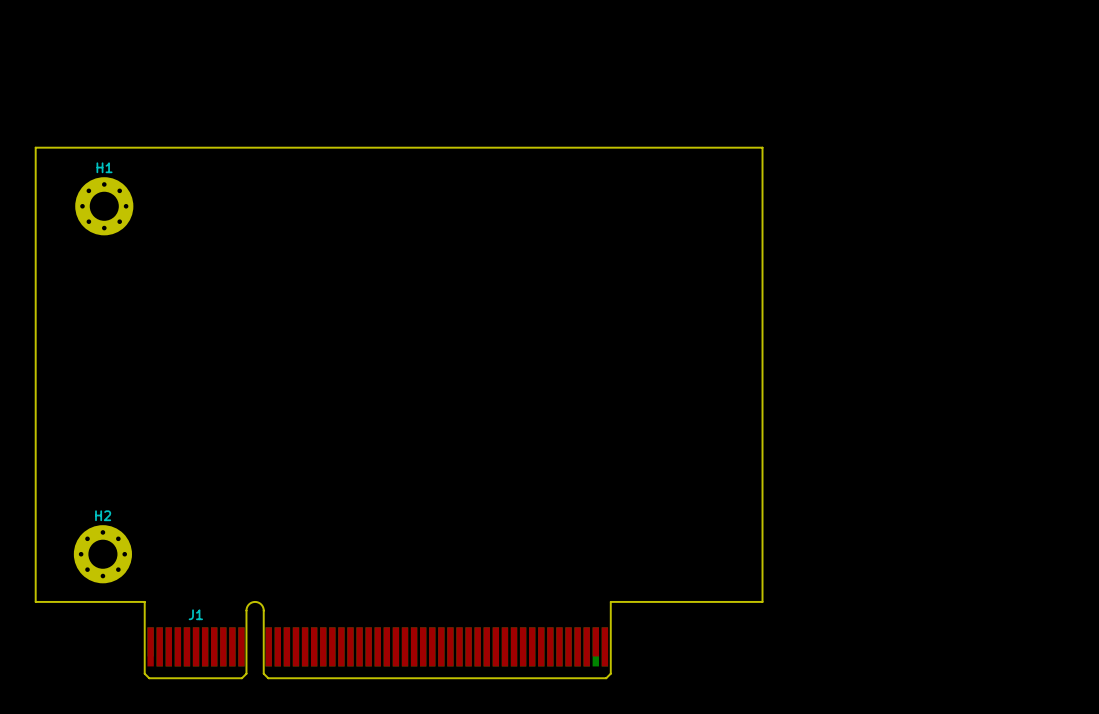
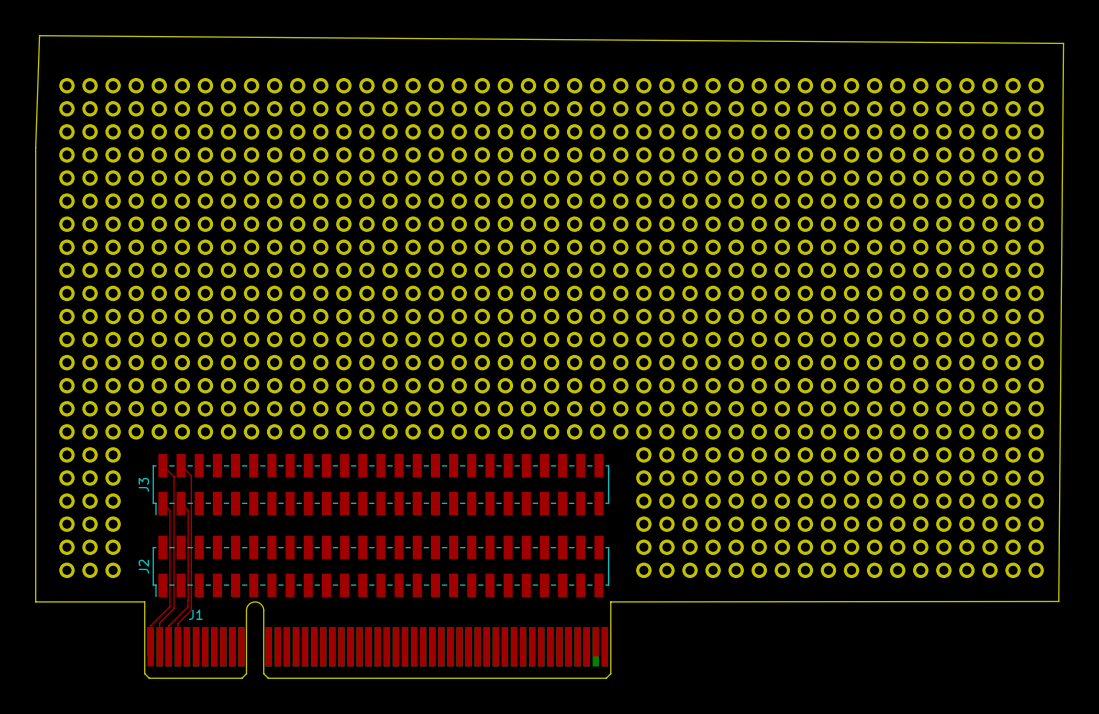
part: none -> (66, 85)
part: none -> (90, 85)
part: none -> (113, 85)
part: none -> (136, 85)
part: none -> (159, 85)
part: none -> (182, 85)
part: none -> (205, 85)
part: none -> (228, 85)
part: none -> (251, 85)
part: none -> (274, 85)
part: none -> (297, 85)
part: none -> (320, 85)
part: none -> (343, 85)
part: none -> (366, 85)
part: none -> (390, 85)
part: none -> (413, 85)
part: none -> (436, 85)
part: none -> (459, 85)
part: none -> (482, 85)
part: none -> (505, 85)
part: none -> (528, 85)
part: none -> (551, 85)
part: none -> (574, 85)
part: none -> (597, 85)
part: none -> (620, 85)
part: none -> (643, 85)
part: none -> (666, 85)
part: none -> (690, 85)
part: none -> (713, 85)
part: none -> (736, 85)
part: none -> (759, 85)
part: none -> (782, 85)
part: none -> (805, 85)
part: none -> (828, 85)
part: none -> (851, 85)
part: none -> (874, 85)
part: none -> (897, 85)
part: none -> (920, 85)
part: none -> (943, 85)
part: none -> (966, 85)
part: none -> (990, 85)
part: none -> (1013, 85)
part: none -> (1036, 85)
part: none -> (66, 108)
part: none -> (90, 108)
part: none -> (113, 108)
part: none -> (136, 108)
part: none -> (159, 108)
part: none -> (182, 108)
part: none -> (205, 108)
part: none -> (228, 108)
part: none -> (251, 108)
part: none -> (274, 108)
part: none -> (297, 108)
part: none -> (320, 108)
part: none -> (343, 108)
part: none -> (366, 108)
part: none -> (390, 108)
part: none -> (413, 108)
part: none -> (436, 108)
part: none -> (459, 108)
part: none -> (482, 108)
part: none -> (505, 108)
part: none -> (528, 108)
part: none -> (551, 108)
part: none -> (574, 108)
part: none -> (597, 108)
part: none -> (620, 108)
part: none -> (643, 108)
part: none -> (666, 108)
part: none -> (690, 108)
part: none -> (713, 108)
part: none -> (736, 108)
part: none -> (759, 108)
part: none -> (782, 108)
part: none -> (805, 108)
part: none -> (828, 108)
part: none -> (851, 108)
part: none -> (874, 108)
part: none -> (897, 108)
part: none -> (920, 108)
part: none -> (943, 108)
part: none -> (966, 108)
part: none -> (990, 108)
part: none -> (1013, 108)
part: none -> (1036, 108)
part: none -> (66, 131)
part: none -> (90, 131)
part: none -> (113, 131)
part: none -> (136, 131)
part: none -> (159, 131)
part: none -> (182, 131)
part: none -> (205, 131)
part: none -> (228, 131)
part: none -> (251, 131)
part: none -> (274, 131)
part: none -> (297, 131)
part: none -> (320, 131)
part: none -> (343, 131)
part: none -> (366, 131)
part: none -> (390, 131)
part: none -> (413, 131)
part: none -> (436, 131)
part: none -> (459, 131)
part: none -> (482, 131)
part: none -> (505, 131)
part: none -> (528, 131)
part: none -> (551, 131)
part: none -> (574, 131)
part: none -> (597, 131)
part: none -> (620, 131)
part: none -> (643, 131)
part: none -> (666, 131)
part: none -> (690, 131)
part: none -> (713, 131)
part: none -> (736, 131)
part: none -> (759, 131)
part: none -> (782, 131)
part: none -> (805, 131)
part: none -> (828, 131)
part: none -> (851, 131)
part: none -> (874, 131)
part: none -> (897, 131)
part: none -> (920, 131)
part: none -> (943, 131)
part: none -> (966, 131)
part: none -> (990, 131)
part: none -> (1013, 131)
part: none -> (1036, 131)
board edge: (35, 147) (762, 147) (762, 601) (610, 601) -> (35, 147) (39, 35) (1063, 43) (1058, 601) (610, 601)
part: none -> (66, 154)
part: none -> (90, 154)
part: none -> (113, 154)
part: none -> (136, 154)
part: none -> (159, 154)
part: none -> (182, 154)
part: none -> (205, 154)
part: none -> (228, 154)
part: none -> (251, 154)
part: none -> (274, 154)
part: none -> (297, 154)
part: none -> (320, 154)
part: none -> (343, 154)
part: none -> (366, 154)
part: none -> (390, 154)
part: none -> (413, 154)
part: none -> (436, 154)
part: none -> (459, 154)
part: none -> (482, 154)
part: none -> (505, 154)
part: none -> (528, 154)
part: none -> (551, 154)
part: none -> (574, 154)
part: none -> (597, 154)
part: none -> (620, 154)
part: none -> (643, 154)
part: none -> (666, 154)
part: none -> (690, 154)
part: none -> (713, 154)
part: none -> (736, 154)
part: none -> (759, 154)
part: none -> (782, 154)
part: none -> (805, 154)
part: none -> (828, 154)
part: none -> (851, 154)
part: none -> (874, 154)
part: none -> (897, 154)
part: none -> (920, 154)
part: none -> (943, 154)
part: none -> (966, 154)
part: none -> (990, 154)
part: none -> (1013, 154)
part: none -> (1036, 154)
part: none -> (66, 178)
part: none -> (90, 178)
part: none -> (113, 178)
part: none -> (136, 178)
part: none -> (159, 178)
part: none -> (182, 178)
part: none -> (205, 178)
part: none -> (228, 178)
part: none -> (251, 178)
part: none -> (274, 178)
part: none -> (297, 178)
part: none -> (320, 178)
part: none -> (343, 178)
part: none -> (366, 178)
part: none -> (390, 178)
part: none -> (413, 178)
part: none -> (436, 178)
part: none -> (459, 178)
part: none -> (482, 178)
part: none -> (505, 178)
part: none -> (528, 178)
part: none -> (551, 178)
part: none -> (574, 178)
part: none -> (597, 178)
part: none -> (620, 178)
part: none -> (643, 178)
part: none -> (666, 178)
part: none -> (690, 178)
part: none -> (713, 178)
part: none -> (736, 178)
part: none -> (759, 178)
part: none -> (782, 178)
part: none -> (805, 178)
part: none -> (828, 178)
part: none -> (851, 178)
part: none -> (874, 178)
part: none -> (897, 178)
part: none -> (920, 178)
part: none -> (943, 178)
part: none -> (966, 178)
part: none -> (990, 178)
part: none -> (1013, 178)
part: none -> (1036, 178)
part: none -> (66, 201)
part: none -> (90, 201)
part: none -> (113, 201)
part: none -> (136, 201)
part: none -> (159, 201)
part: none -> (182, 201)
part: none -> (205, 201)
part: none -> (228, 201)
part: none -> (251, 201)
part: none -> (274, 201)
part: none -> (297, 201)
part: none -> (320, 201)
part: none -> (343, 201)
part: none -> (366, 201)
part: none -> (390, 201)
part: none -> (413, 201)
part: none -> (436, 201)
part: none -> (459, 201)
part: none -> (482, 201)
part: none -> (505, 201)
part: none -> (528, 201)
part: none -> (551, 201)
part: none -> (574, 201)
part: none -> (597, 201)
part: none -> (620, 201)
part: none -> (643, 201)
part: none -> (666, 201)
part: none -> (690, 201)
part: none -> (713, 201)
part: none -> (736, 201)
part: none -> (759, 201)
part: none -> (782, 201)
part: none -> (805, 201)
part: none -> (828, 201)
part: none -> (851, 201)
part: none -> (874, 201)
part: none -> (897, 201)
part: none -> (920, 201)
part: none -> (943, 201)
part: none -> (966, 201)
part: none -> (990, 201)
part: none -> (1013, 201)
part: none -> (1036, 201)
H1: (104, 206) -> none
part: none -> (66, 224)
part: none -> (90, 224)
part: none -> (113, 224)
part: none -> (136, 224)
part: none -> (159, 224)
part: none -> (182, 224)
part: none -> (205, 224)
part: none -> (228, 224)
part: none -> (251, 224)
part: none -> (274, 224)
part: none -> (297, 224)
part: none -> (320, 224)
part: none -> (343, 224)
part: none -> (366, 224)
part: none -> (390, 224)
part: none -> (413, 224)
part: none -> (436, 224)
part: none -> (459, 224)
part: none -> (482, 224)
part: none -> (505, 224)
part: none -> (528, 224)
part: none -> (551, 224)
part: none -> (574, 224)
part: none -> (597, 224)
part: none -> (620, 224)
part: none -> (643, 224)
part: none -> (666, 224)
part: none -> (690, 224)
part: none -> (713, 224)
part: none -> (736, 224)
part: none -> (759, 224)
part: none -> (782, 224)
part: none -> (805, 224)
part: none -> (828, 224)
part: none -> (851, 224)
part: none -> (874, 224)
part: none -> (897, 224)
part: none -> (920, 224)
part: none -> (943, 224)
part: none -> (966, 224)
part: none -> (990, 224)
part: none -> (1013, 224)
part: none -> (1036, 224)
part: none -> (66, 247)
part: none -> (90, 247)
part: none -> (113, 247)
part: none -> (136, 247)
part: none -> (159, 247)
part: none -> (182, 247)
part: none -> (205, 247)
part: none -> (228, 247)
part: none -> (251, 247)
part: none -> (274, 247)
part: none -> (297, 247)
part: none -> (320, 247)
part: none -> (343, 247)
part: none -> (366, 247)
part: none -> (390, 247)
part: none -> (413, 247)
part: none -> (436, 247)
part: none -> (459, 247)
part: none -> (482, 247)
part: none -> (505, 247)
part: none -> (528, 247)
part: none -> (551, 247)
part: none -> (574, 247)
part: none -> (597, 247)
part: none -> (620, 247)
part: none -> (643, 247)
part: none -> (666, 247)
part: none -> (690, 247)
part: none -> (713, 247)
part: none -> (736, 247)
part: none -> (759, 247)
part: none -> (782, 247)
part: none -> (805, 247)
part: none -> (828, 247)
part: none -> (851, 247)
part: none -> (874, 247)
part: none -> (897, 247)
part: none -> (920, 247)
part: none -> (943, 247)
part: none -> (966, 247)
part: none -> (990, 247)
part: none -> (1013, 247)
part: none -> (1036, 247)
part: none -> (66, 270)
part: none -> (90, 270)
part: none -> (113, 270)
part: none -> (136, 270)
part: none -> (159, 270)
part: none -> (182, 270)
part: none -> (205, 270)
part: none -> (228, 270)
part: none -> (251, 270)
part: none -> (274, 270)
part: none -> (297, 270)
part: none -> (320, 270)
part: none -> (343, 270)
part: none -> (366, 270)
part: none -> (390, 270)
part: none -> (413, 270)
part: none -> (436, 270)
part: none -> (459, 270)
part: none -> (482, 270)
part: none -> (505, 270)
part: none -> (528, 270)
part: none -> (551, 270)
part: none -> (574, 270)
part: none -> (597, 270)
part: none -> (620, 270)
part: none -> (643, 270)
part: none -> (666, 270)
part: none -> (690, 270)
part: none -> (713, 270)
part: none -> (736, 270)
part: none -> (759, 270)
part: none -> (782, 270)
part: none -> (805, 270)
part: none -> (828, 270)
part: none -> (851, 270)
part: none -> (874, 270)
part: none -> (897, 270)
part: none -> (920, 270)
part: none -> (943, 270)
part: none -> (966, 270)
part: none -> (990, 270)
part: none -> (1013, 270)
part: none -> (1036, 270)
part: none -> (66, 293)
part: none -> (90, 293)
part: none -> (113, 293)
part: none -> (136, 293)
part: none -> (159, 293)
part: none -> (182, 293)
part: none -> (205, 293)
part: none -> (228, 293)
part: none -> (251, 293)
part: none -> (274, 293)
part: none -> (297, 293)
part: none -> (320, 293)
part: none -> (343, 293)
part: none -> (366, 293)
part: none -> (390, 293)
part: none -> (413, 293)
part: none -> (436, 293)
part: none -> (459, 293)
part: none -> (482, 293)
part: none -> (505, 293)
part: none -> (528, 293)
part: none -> (551, 293)
part: none -> (574, 293)
part: none -> (597, 293)
part: none -> (620, 293)
part: none -> (643, 293)
part: none -> (666, 293)
part: none -> (690, 293)
part: none -> (713, 293)
part: none -> (736, 293)
part: none -> (759, 293)
part: none -> (782, 293)
part: none -> (805, 293)
part: none -> (828, 293)
part: none -> (851, 293)
part: none -> (874, 293)
part: none -> (897, 293)
part: none -> (920, 293)
part: none -> (943, 293)
part: none -> (966, 293)
part: none -> (990, 293)
part: none -> (1013, 293)
part: none -> (1036, 293)
part: none -> (66, 316)
part: none -> (90, 316)
part: none -> (113, 316)
part: none -> (136, 316)
part: none -> (159, 316)
part: none -> (182, 316)
part: none -> (205, 316)
part: none -> (228, 316)
part: none -> (251, 316)
part: none -> (274, 316)
part: none -> (297, 316)
part: none -> (320, 316)
part: none -> (343, 316)
part: none -> (366, 316)
part: none -> (390, 316)
part: none -> (413, 316)
part: none -> (436, 316)
part: none -> (459, 316)
part: none -> (482, 316)
part: none -> (505, 316)
part: none -> (528, 316)
part: none -> (551, 316)
part: none -> (574, 316)
part: none -> (597, 316)
part: none -> (620, 316)
part: none -> (643, 316)
part: none -> (666, 316)
part: none -> (690, 316)
part: none -> (713, 316)
part: none -> (736, 316)
part: none -> (759, 316)
part: none -> (782, 316)
part: none -> (805, 316)
part: none -> (828, 316)
part: none -> (851, 316)
part: none -> (874, 316)
part: none -> (897, 316)
part: none -> (920, 316)
part: none -> (943, 316)
part: none -> (966, 316)
part: none -> (990, 316)
part: none -> (1013, 316)
part: none -> (1036, 316)
part: none -> (66, 339)
part: none -> (90, 339)
part: none -> (113, 339)
part: none -> (136, 339)
part: none -> (159, 339)
part: none -> (182, 339)
part: none -> (205, 339)
part: none -> (228, 339)
part: none -> (251, 339)
part: none -> (274, 339)
part: none -> (297, 339)
part: none -> (320, 339)
part: none -> (343, 339)
part: none -> (366, 339)
part: none -> (390, 339)
part: none -> (413, 339)
part: none -> (436, 339)
part: none -> (459, 339)
part: none -> (482, 339)
part: none -> (505, 339)
part: none -> (528, 339)
part: none -> (551, 339)
part: none -> (574, 339)
part: none -> (597, 339)
part: none -> (620, 339)
part: none -> (643, 339)
part: none -> (666, 339)
part: none -> (690, 339)
part: none -> (713, 339)
part: none -> (736, 339)
part: none -> (759, 339)
part: none -> (782, 339)
part: none -> (805, 339)
part: none -> (828, 339)
part: none -> (851, 339)
part: none -> (874, 339)
part: none -> (897, 339)
part: none -> (920, 339)
part: none -> (943, 339)
part: none -> (966, 339)
part: none -> (990, 339)
part: none -> (1013, 339)
part: none -> (1036, 339)
part: none -> (66, 362)
part: none -> (90, 362)
part: none -> (113, 362)
part: none -> (136, 362)
part: none -> (159, 362)
part: none -> (182, 362)
part: none -> (205, 362)
part: none -> (228, 362)
part: none -> (251, 362)
part: none -> (274, 362)
part: none -> (297, 362)
part: none -> (320, 362)
part: none -> (343, 362)
part: none -> (366, 362)
part: none -> (390, 362)
part: none -> (413, 362)
part: none -> (436, 362)
part: none -> (459, 362)
part: none -> (482, 362)
part: none -> (505, 362)
part: none -> (528, 362)
part: none -> (551, 362)
part: none -> (574, 362)
part: none -> (597, 362)
part: none -> (620, 362)
part: none -> (643, 362)
part: none -> (666, 362)
part: none -> (690, 362)
part: none -> (713, 362)
part: none -> (736, 362)
part: none -> (759, 362)
part: none -> (782, 362)
part: none -> (805, 362)
part: none -> (828, 362)
part: none -> (851, 362)
part: none -> (874, 362)
part: none -> (897, 362)
part: none -> (920, 362)
part: none -> (943, 362)
part: none -> (966, 362)
part: none -> (990, 362)
part: none -> (1013, 362)
part: none -> (1036, 362)
part: none -> (66, 385)
part: none -> (90, 385)
part: none -> (113, 385)
part: none -> (136, 385)
part: none -> (159, 385)
part: none -> (182, 385)
part: none -> (205, 385)
part: none -> (228, 385)
part: none -> (251, 385)
part: none -> (274, 385)
part: none -> (297, 385)
part: none -> (320, 385)
part: none -> (343, 385)
part: none -> (366, 385)
part: none -> (390, 385)
part: none -> (413, 385)
part: none -> (436, 385)
part: none -> (459, 385)
part: none -> (482, 385)
part: none -> (505, 385)
part: none -> (528, 385)
part: none -> (551, 385)
part: none -> (574, 385)
part: none -> (597, 385)
part: none -> (620, 385)
part: none -> (643, 385)
part: none -> (666, 385)
part: none -> (690, 385)
part: none -> (713, 385)
part: none -> (736, 385)
part: none -> (759, 385)
part: none -> (782, 385)
part: none -> (805, 385)
part: none -> (828, 385)
part: none -> (851, 385)
part: none -> (874, 385)
part: none -> (897, 385)
part: none -> (920, 385)
part: none -> (943, 385)
part: none -> (966, 385)
part: none -> (990, 385)
part: none -> (1013, 385)
part: none -> (1036, 385)
part: none -> (66, 408)
part: none -> (90, 408)
part: none -> (113, 408)
part: none -> (136, 408)
part: none -> (159, 408)
part: none -> (182, 408)
part: none -> (205, 408)
part: none -> (228, 408)
part: none -> (251, 408)
part: none -> (274, 408)
part: none -> (297, 408)
part: none -> (320, 408)
part: none -> (343, 408)
part: none -> (366, 408)
part: none -> (390, 408)
part: none -> (413, 408)
part: none -> (436, 408)
part: none -> (459, 408)
part: none -> (482, 408)
part: none -> (505, 408)
part: none -> (528, 408)
part: none -> (551, 408)
part: none -> (574, 408)
part: none -> (597, 408)
part: none -> (620, 408)
part: none -> (643, 408)
part: none -> (666, 408)
part: none -> (690, 408)
part: none -> (713, 408)
part: none -> (736, 408)
part: none -> (759, 408)
part: none -> (782, 408)
part: none -> (805, 408)
part: none -> (828, 408)
part: none -> (851, 408)
part: none -> (874, 408)
part: none -> (897, 408)
part: none -> (920, 408)
part: none -> (943, 408)
part: none -> (966, 408)
part: none -> (990, 408)
part: none -> (1013, 408)
part: none -> (1036, 408)
part: none -> (66, 431)
part: none -> (90, 431)
part: none -> (113, 431)
part: none -> (136, 431)
part: none -> (159, 431)
part: none -> (182, 431)
part: none -> (205, 431)
part: none -> (228, 431)
part: none -> (251, 431)
part: none -> (274, 431)
part: none -> (297, 431)
part: none -> (320, 431)
part: none -> (343, 431)
part: none -> (366, 431)
part: none -> (390, 431)
part: none -> (413, 431)
part: none -> (436, 431)
part: none -> (459, 431)
part: none -> (482, 431)
part: none -> (505, 431)
part: none -> (528, 431)
part: none -> (551, 431)
part: none -> (574, 431)
part: none -> (597, 431)
part: none -> (620, 431)
part: none -> (643, 431)
part: none -> (666, 431)
part: none -> (690, 431)
part: none -> (713, 431)
part: none -> (736, 431)
part: none -> (759, 431)
part: none -> (782, 431)
part: none -> (805, 431)
part: none -> (828, 431)
part: none -> (851, 431)
part: none -> (874, 431)
part: none -> (897, 431)
part: none -> (920, 431)
part: none -> (943, 431)
part: none -> (966, 431)
part: none -> (990, 431)
part: none -> (1013, 431)
part: none -> (1036, 431)
part: none -> (66, 454)
part: none -> (90, 454)
part: none -> (113, 454)
part: none -> (643, 454)
part: none -> (666, 454)
part: none -> (690, 454)
part: none -> (713, 454)
part: none -> (736, 454)
part: none -> (759, 454)
part: none -> (782, 454)
part: none -> (805, 454)
part: none -> (828, 454)
part: none -> (851, 454)
part: none -> (874, 454)
part: none -> (897, 454)
part: none -> (920, 454)
part: none -> (943, 454)
part: none -> (966, 454)
part: none -> (990, 454)
part: none -> (1013, 454)
part: none -> (1036, 454)
top track: none -> (162, 465) (174, 476) (174, 608) (159, 622) (159, 646)
top track: none -> (181, 465) (191, 475) (191, 610) (177, 623) (177, 646)
part: none -> (66, 478)
part: none -> (90, 478)
part: none -> (113, 478)
part: none -> (643, 478)
part: none -> (666, 478)
part: none -> (690, 478)
part: none -> (713, 478)
part: none -> (736, 478)
part: none -> (759, 478)
part: none -> (782, 478)
part: none -> (805, 478)
part: none -> (828, 478)
part: none -> (851, 478)
part: none -> (874, 478)
part: none -> (897, 478)
part: none -> (920, 478)
part: none -> (943, 478)
part: none -> (966, 478)
part: none -> (990, 478)
part: none -> (1013, 478)
part: none -> (1036, 478)
J3: none -> (380, 484)
part: none -> (66, 501)
part: none -> (90, 501)
part: none -> (113, 501)
part: none -> (643, 501)
part: none -> (666, 501)
part: none -> (690, 501)
part: none -> (713, 501)
part: none -> (736, 501)
part: none -> (759, 501)
part: none -> (782, 501)
part: none -> (805, 501)
part: none -> (828, 501)
part: none -> (851, 501)
part: none -> (874, 501)
part: none -> (897, 501)
part: none -> (920, 501)
part: none -> (943, 501)
part: none -> (966, 501)
part: none -> (990, 501)
part: none -> (1013, 501)
part: none -> (1036, 501)
top track: none -> (162, 503) (169, 510) (169, 606) (150, 625) (150, 646)
top track: none -> (181, 503) (188, 510) (187, 606) (168, 625) (168, 646)
part: none -> (66, 524)
part: none -> (90, 524)
part: none -> (113, 524)
part: none -> (643, 524)
part: none -> (666, 524)
part: none -> (690, 524)
part: none -> (713, 524)
part: none -> (736, 524)
part: none -> (759, 524)
part: none -> (782, 524)
part: none -> (805, 524)
part: none -> (828, 524)
part: none -> (851, 524)
part: none -> (874, 524)
part: none -> (897, 524)
part: none -> (920, 524)
part: none -> (943, 524)
part: none -> (966, 524)
part: none -> (990, 524)
part: none -> (1013, 524)
part: none -> (1036, 524)
part: none -> (66, 547)
part: none -> (90, 547)
part: none -> (113, 547)
part: none -> (643, 547)
part: none -> (666, 547)
part: none -> (690, 547)
part: none -> (713, 547)
part: none -> (736, 547)
part: none -> (759, 547)
part: none -> (782, 547)
part: none -> (805, 547)
part: none -> (828, 547)
part: none -> (851, 547)
part: none -> (874, 547)
part: none -> (897, 547)
part: none -> (920, 547)
part: none -> (943, 547)
part: none -> (966, 547)
part: none -> (990, 547)
part: none -> (1013, 547)
part: none -> (1036, 547)
H2: (102, 554) -> none
J2: none -> (380, 566)
part: none -> (66, 570)
part: none -> (90, 570)
part: none -> (113, 570)
part: none -> (643, 570)
part: none -> (666, 570)
part: none -> (690, 570)
part: none -> (713, 570)
part: none -> (736, 570)
part: none -> (759, 570)
part: none -> (782, 570)
part: none -> (805, 570)
part: none -> (828, 570)
part: none -> (851, 570)
part: none -> (874, 570)
part: none -> (897, 570)
part: none -> (920, 570)
part: none -> (943, 570)
part: none -> (966, 570)
part: none -> (990, 570)
part: none -> (1013, 570)
part: none -> (1036, 570)

